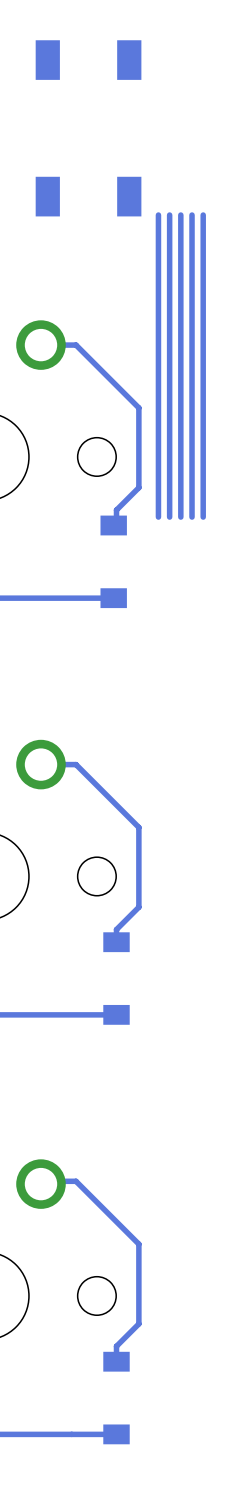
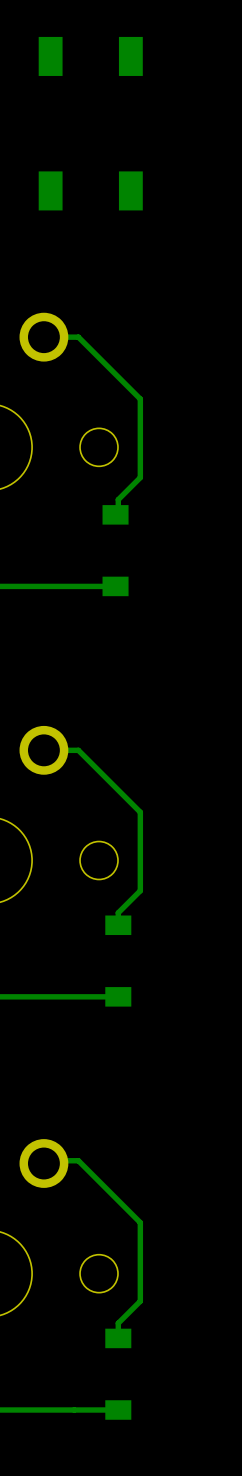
bottom track: (158, 215) (158, 517) -> none
bottom track: (169, 215) (169, 517) -> none
bottom track: (180, 215) (180, 517) -> none
bottom track: (192, 215) (192, 517) -> none
bottom track: (203, 215) (203, 517) -> none

